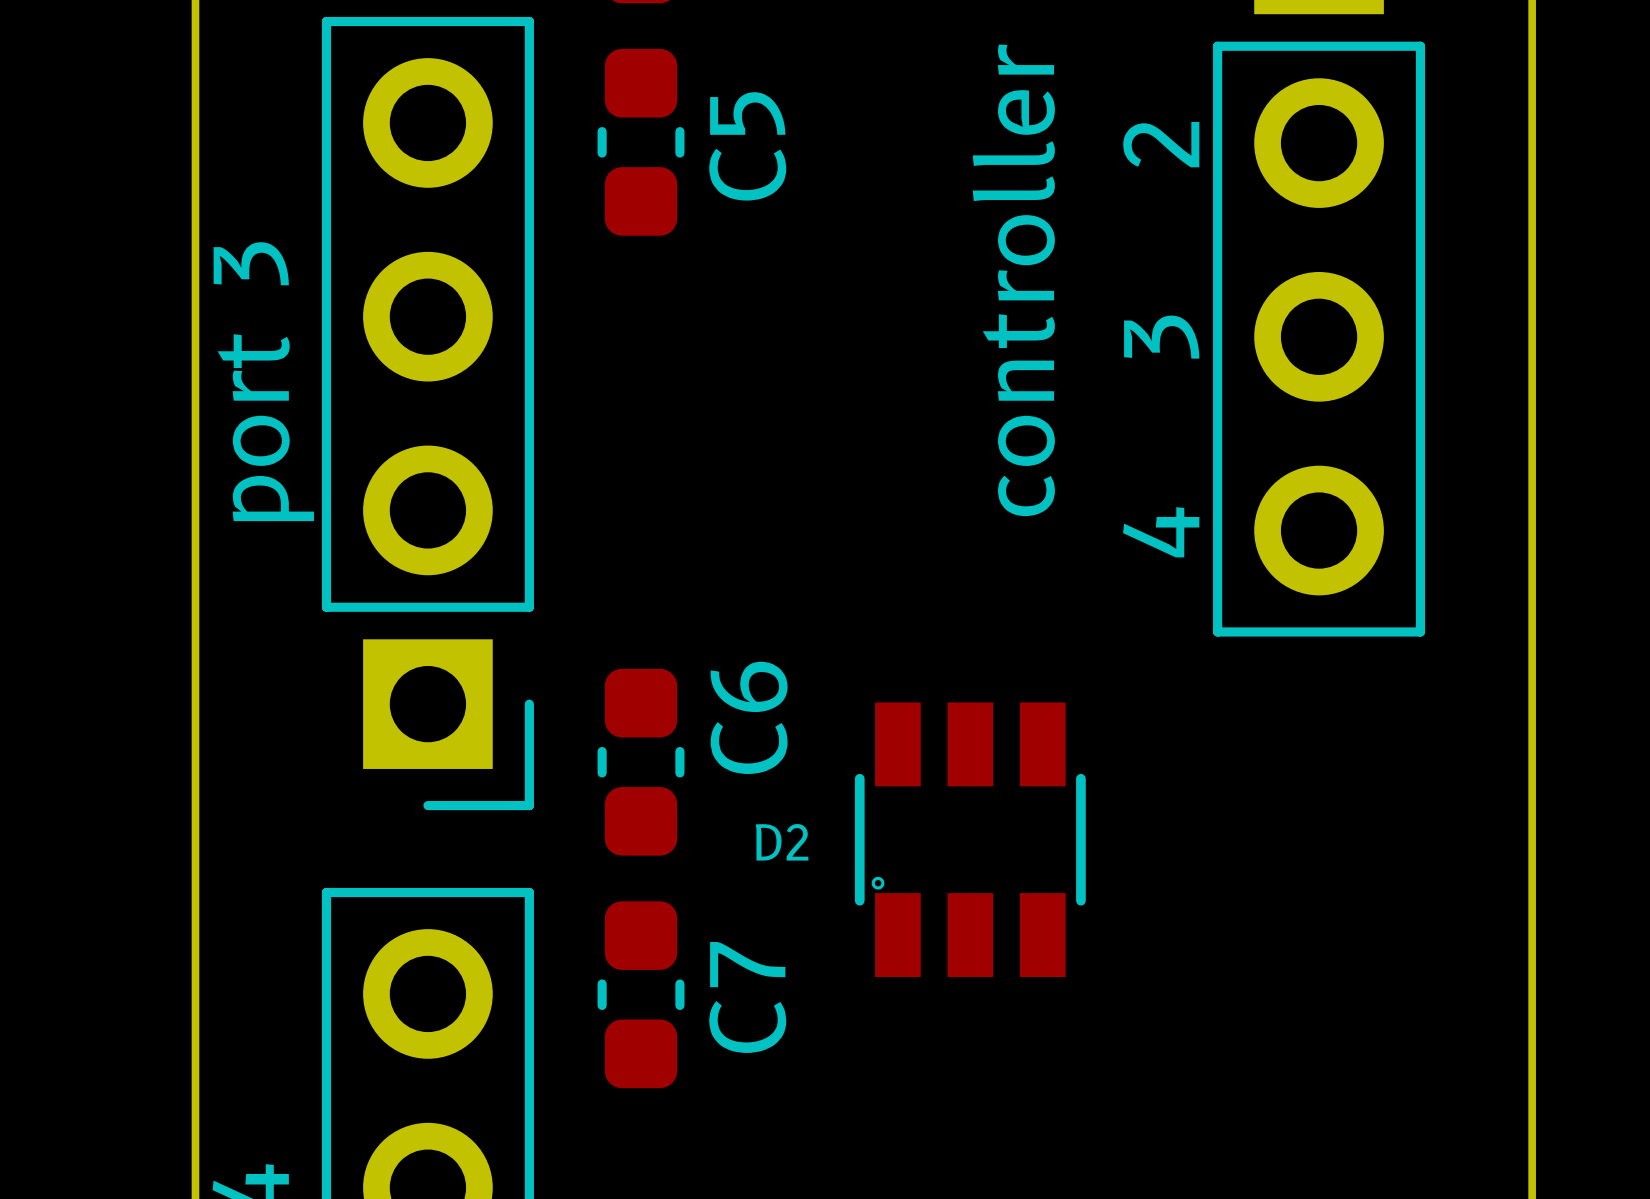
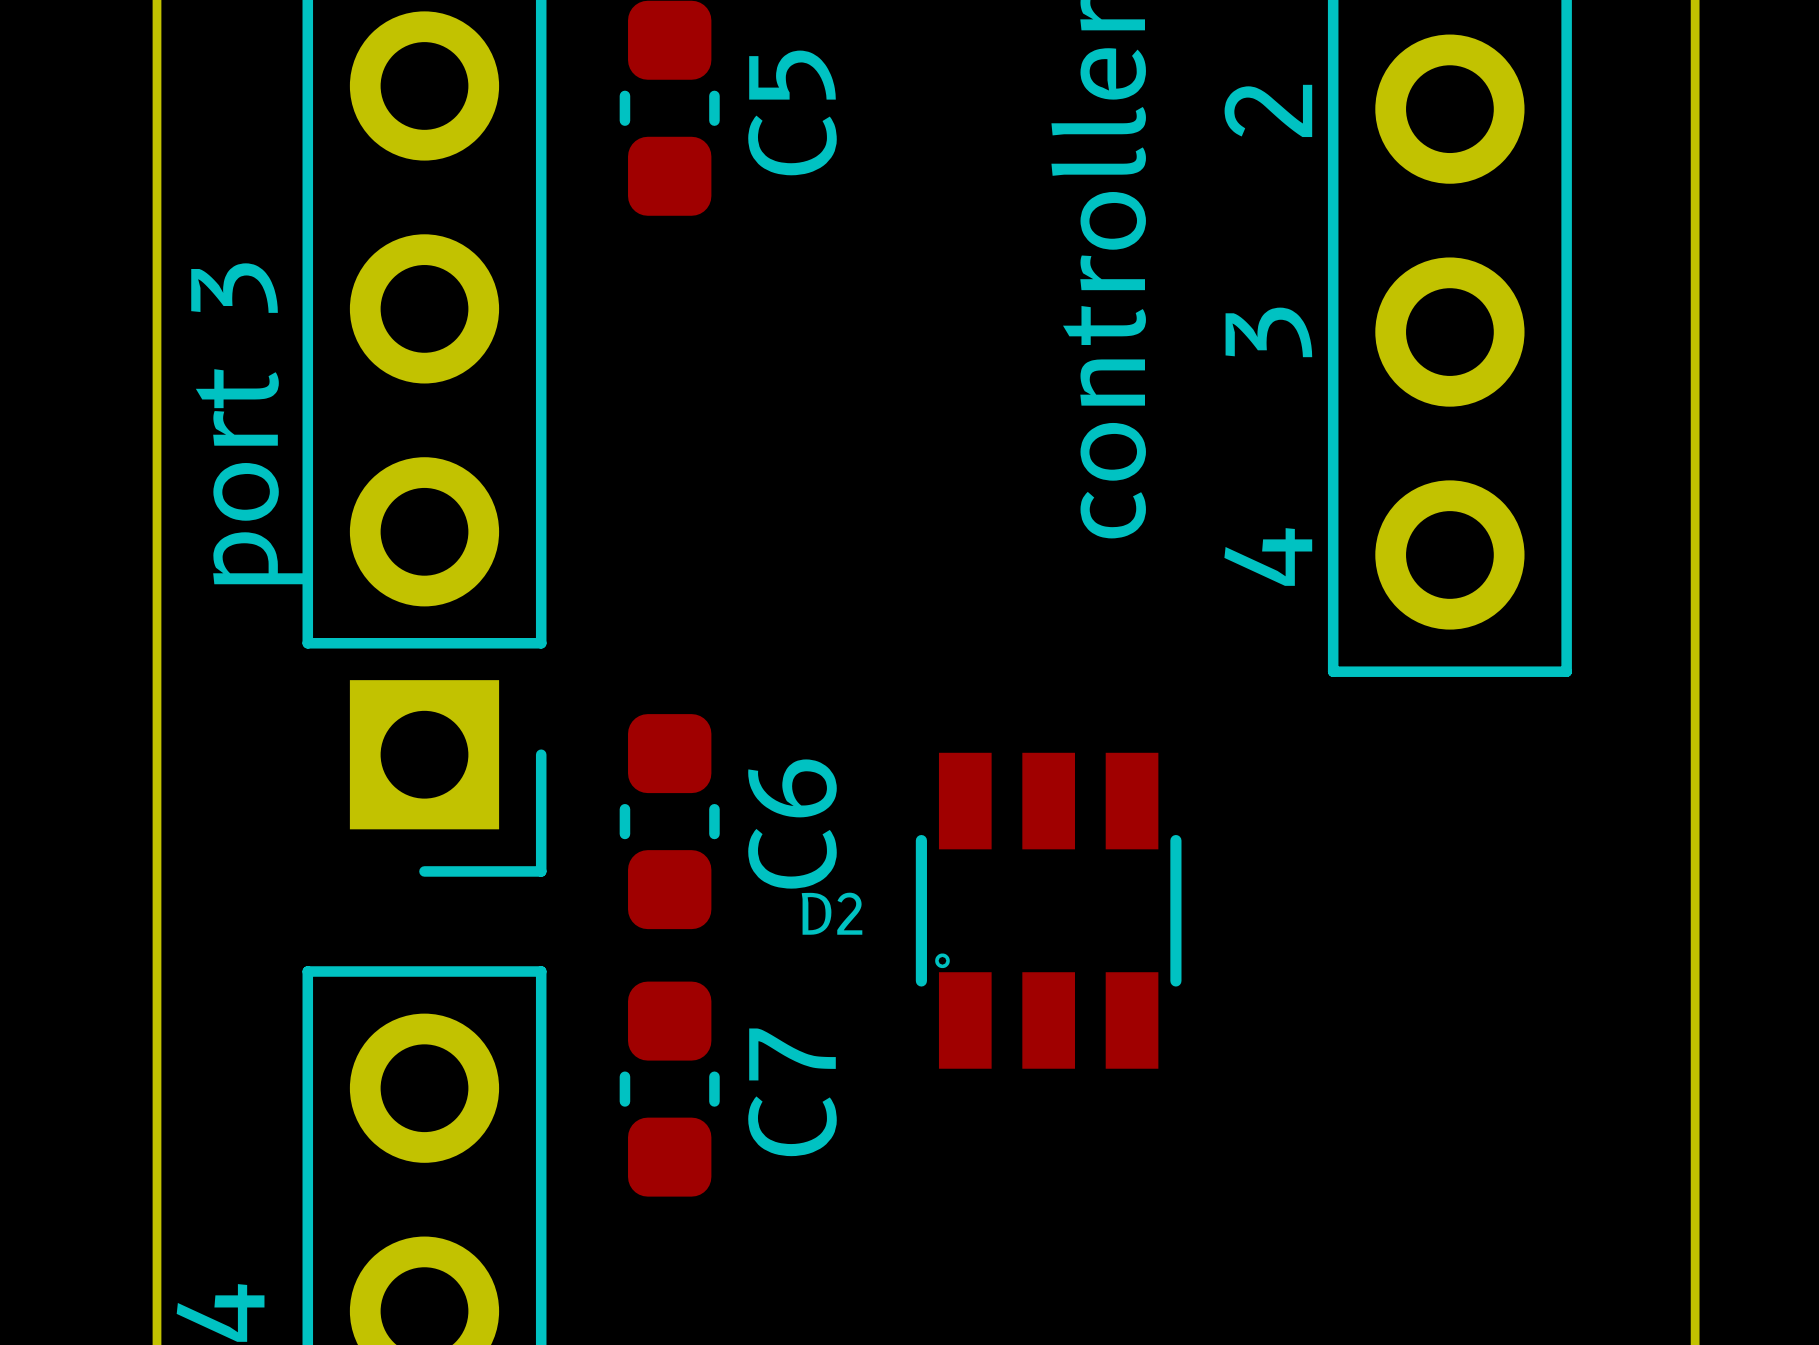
part value position: port 3 (263, 381) -> port 3 (248, 423)
C6 name position: C6 (749, 717) -> C6 (792, 824)

